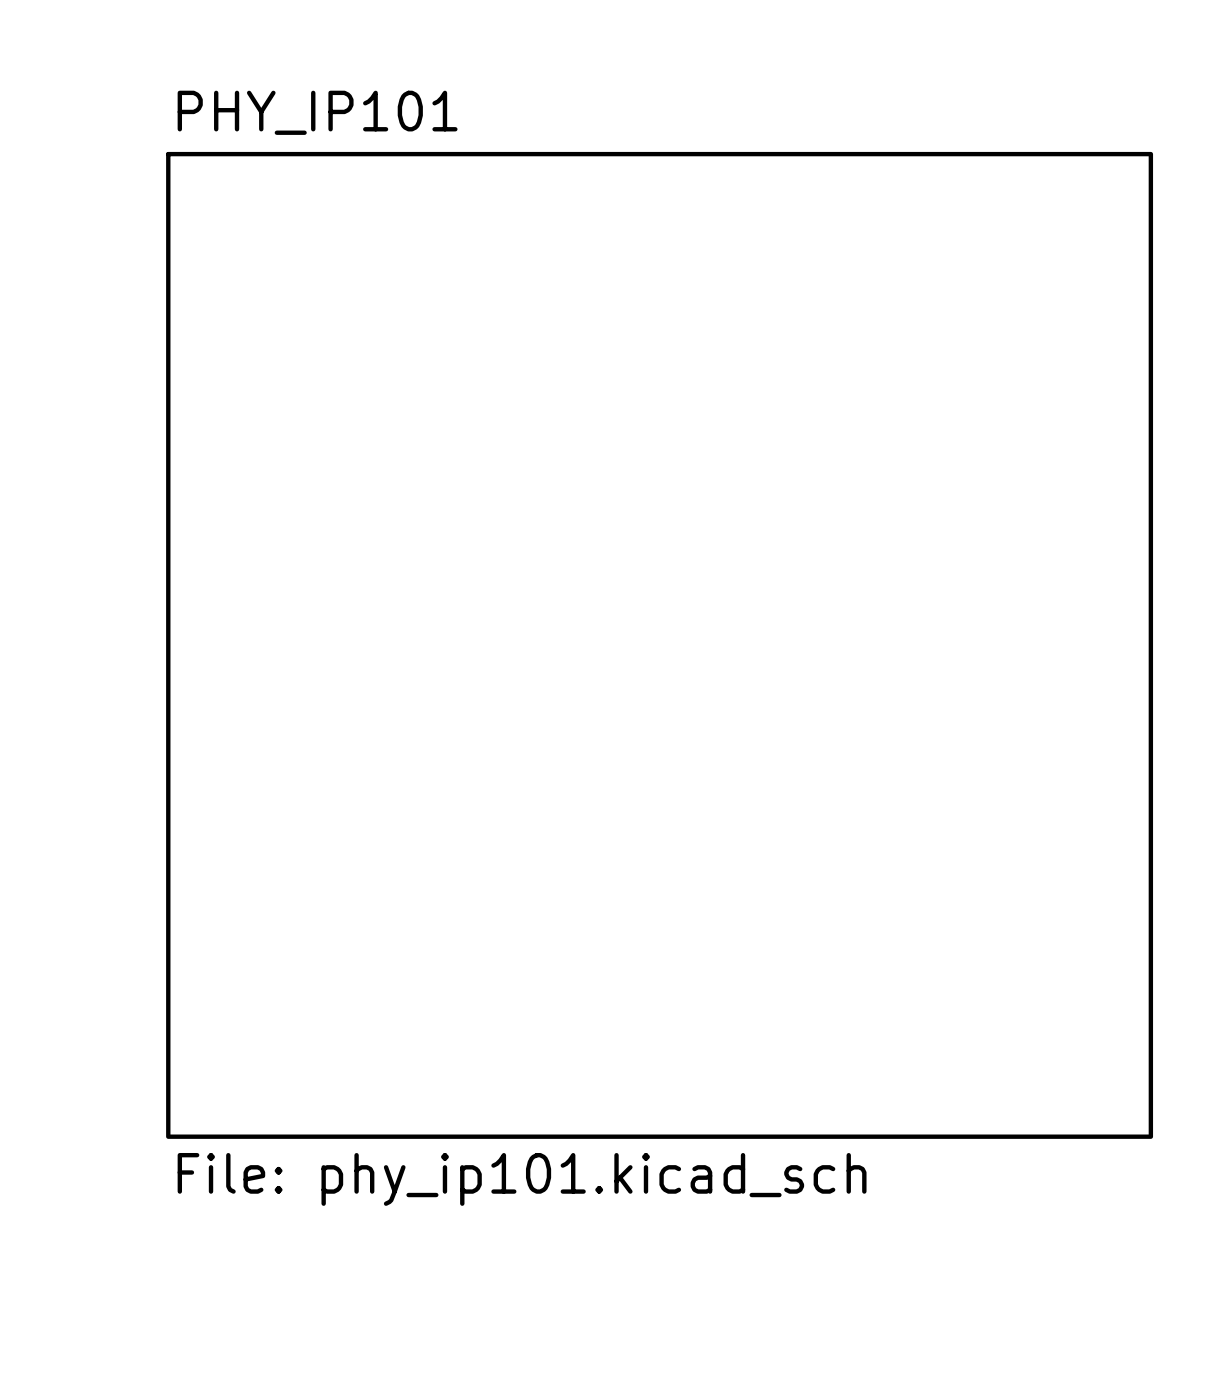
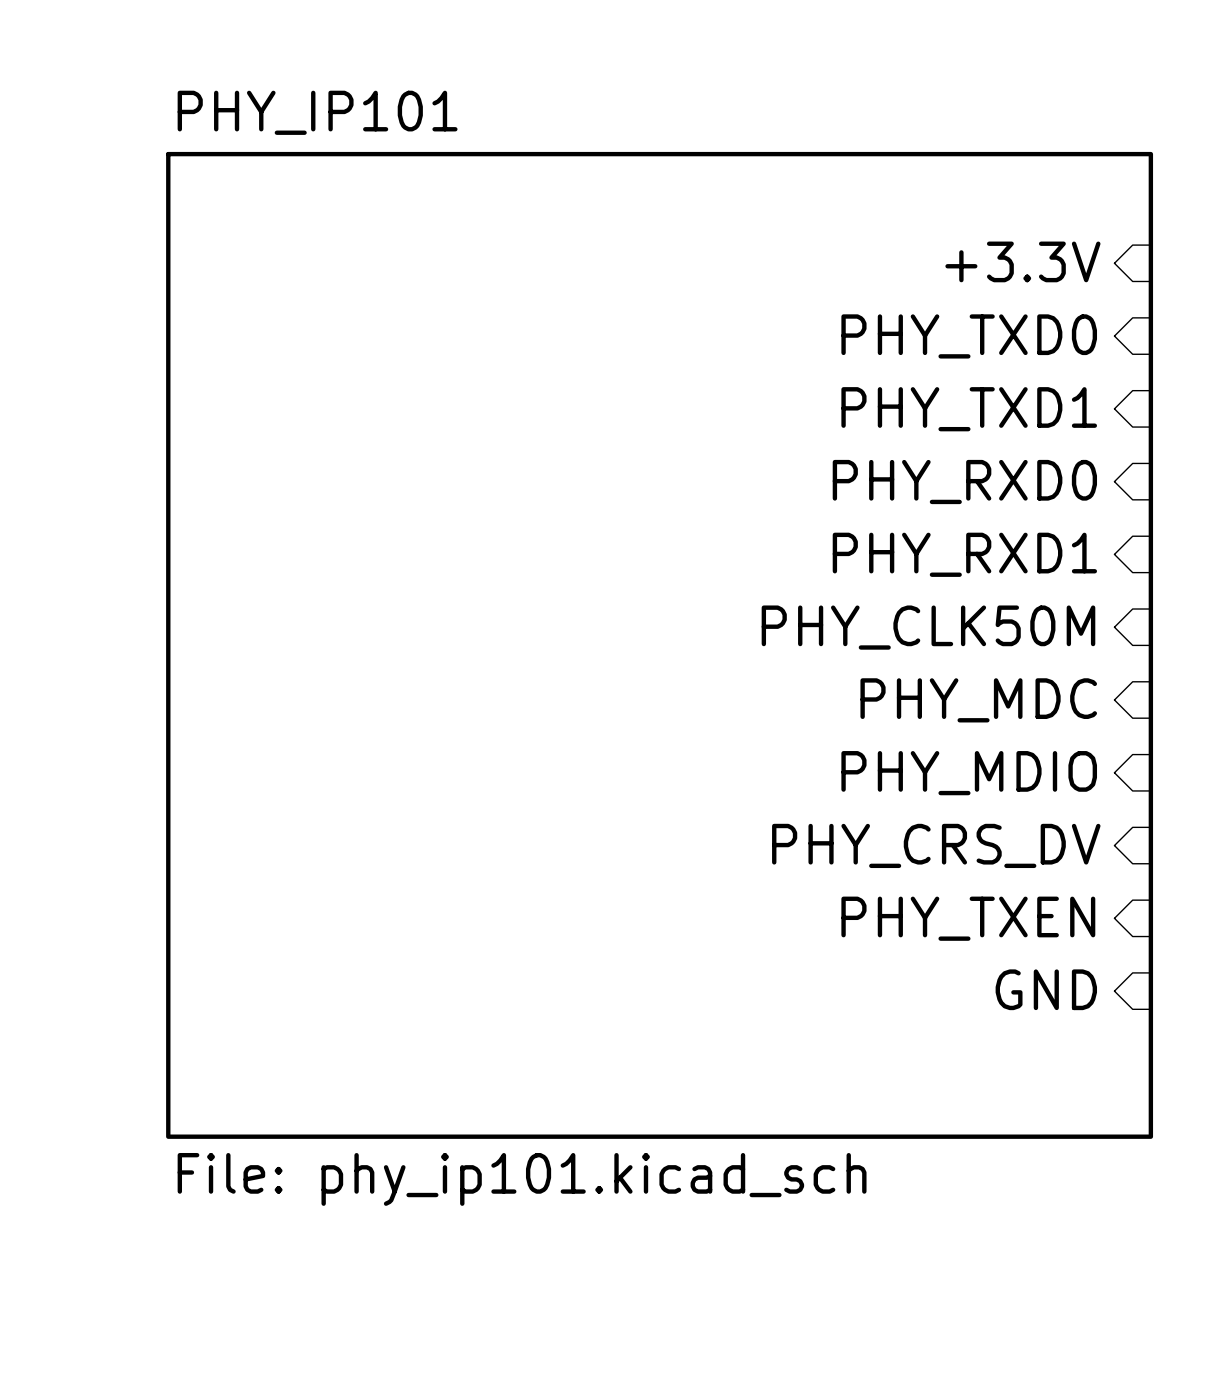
sheet pin: none -> +3.3V (1022, 261)
sheet pin: none -> PHY_TXD0 (969, 336)
sheet pin: none -> PHY_TXD1 (969, 409)
sheet pin: none -> PHY_RXD0 (964, 482)
sheet pin: none -> PHY_RXD1 (964, 554)
sheet pin: none -> PHY_CLK50M (928, 627)
sheet pin: none -> PHY_MDC (978, 700)
sheet pin: none -> PHY_MDIO (969, 773)
sheet pin: none -> PHY_CRS_DV (936, 845)
sheet pin: none -> PHY_TXEN (968, 918)
sheet pin: none -> GND (1046, 989)

